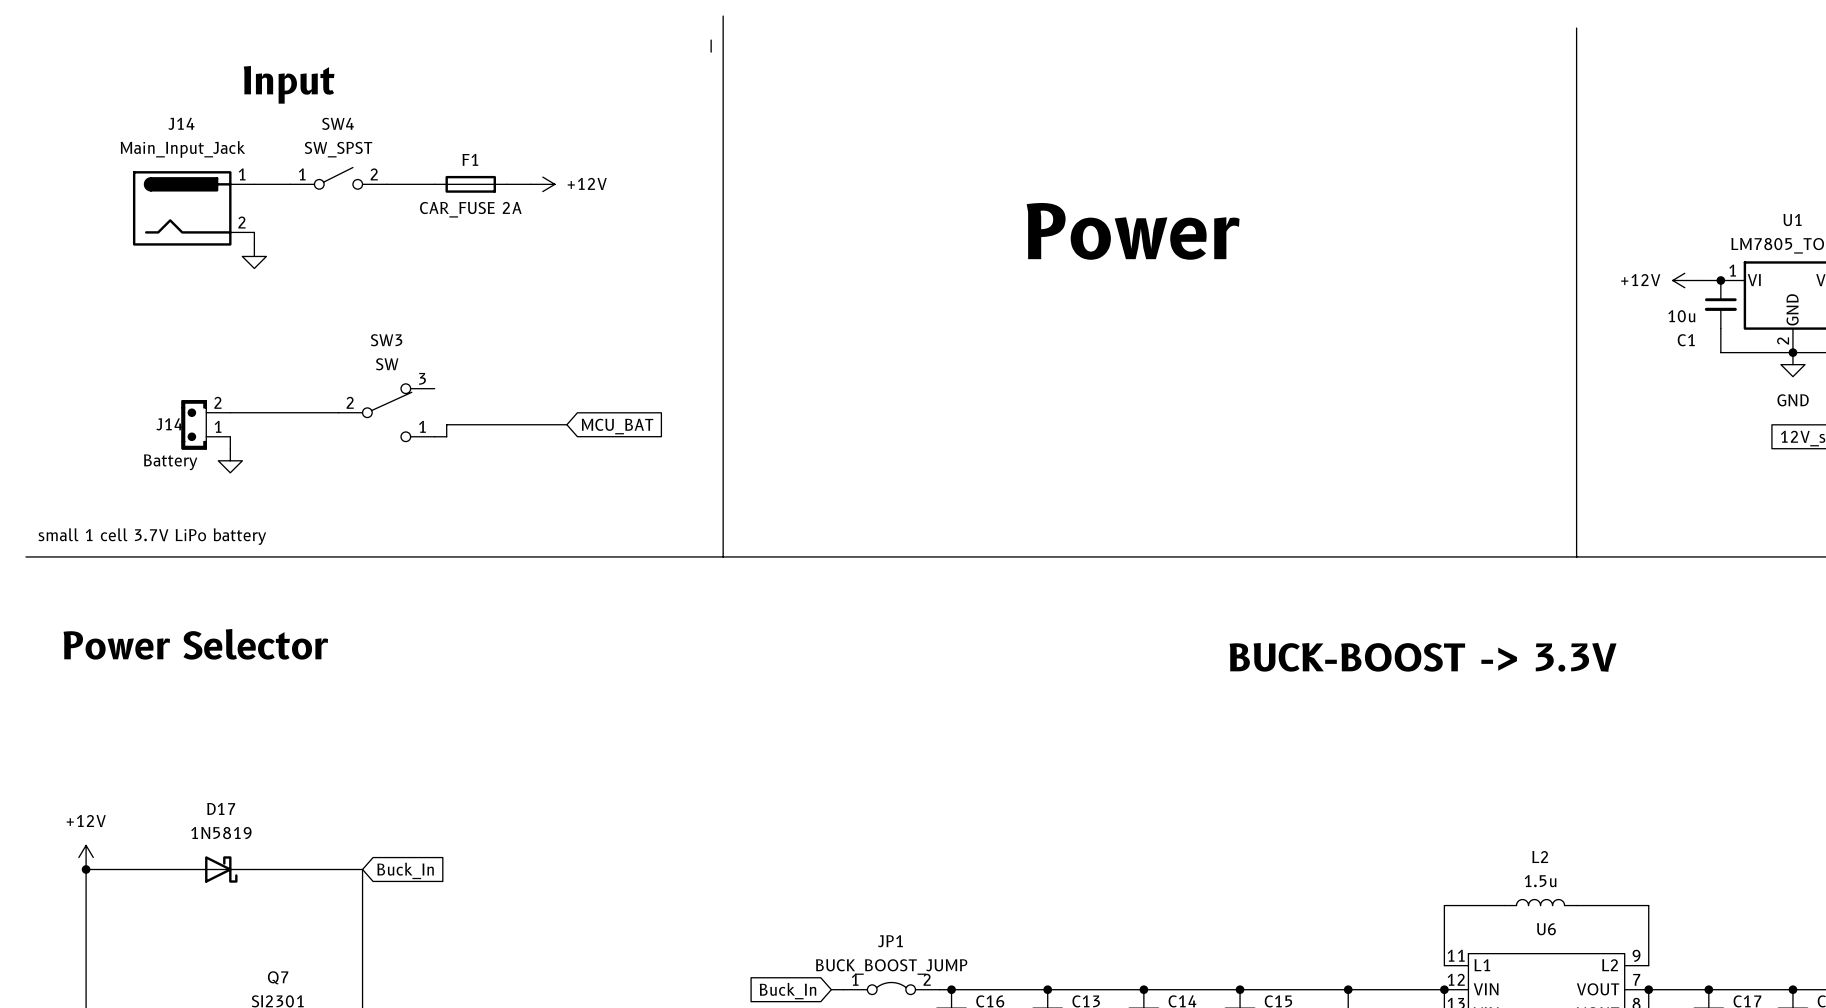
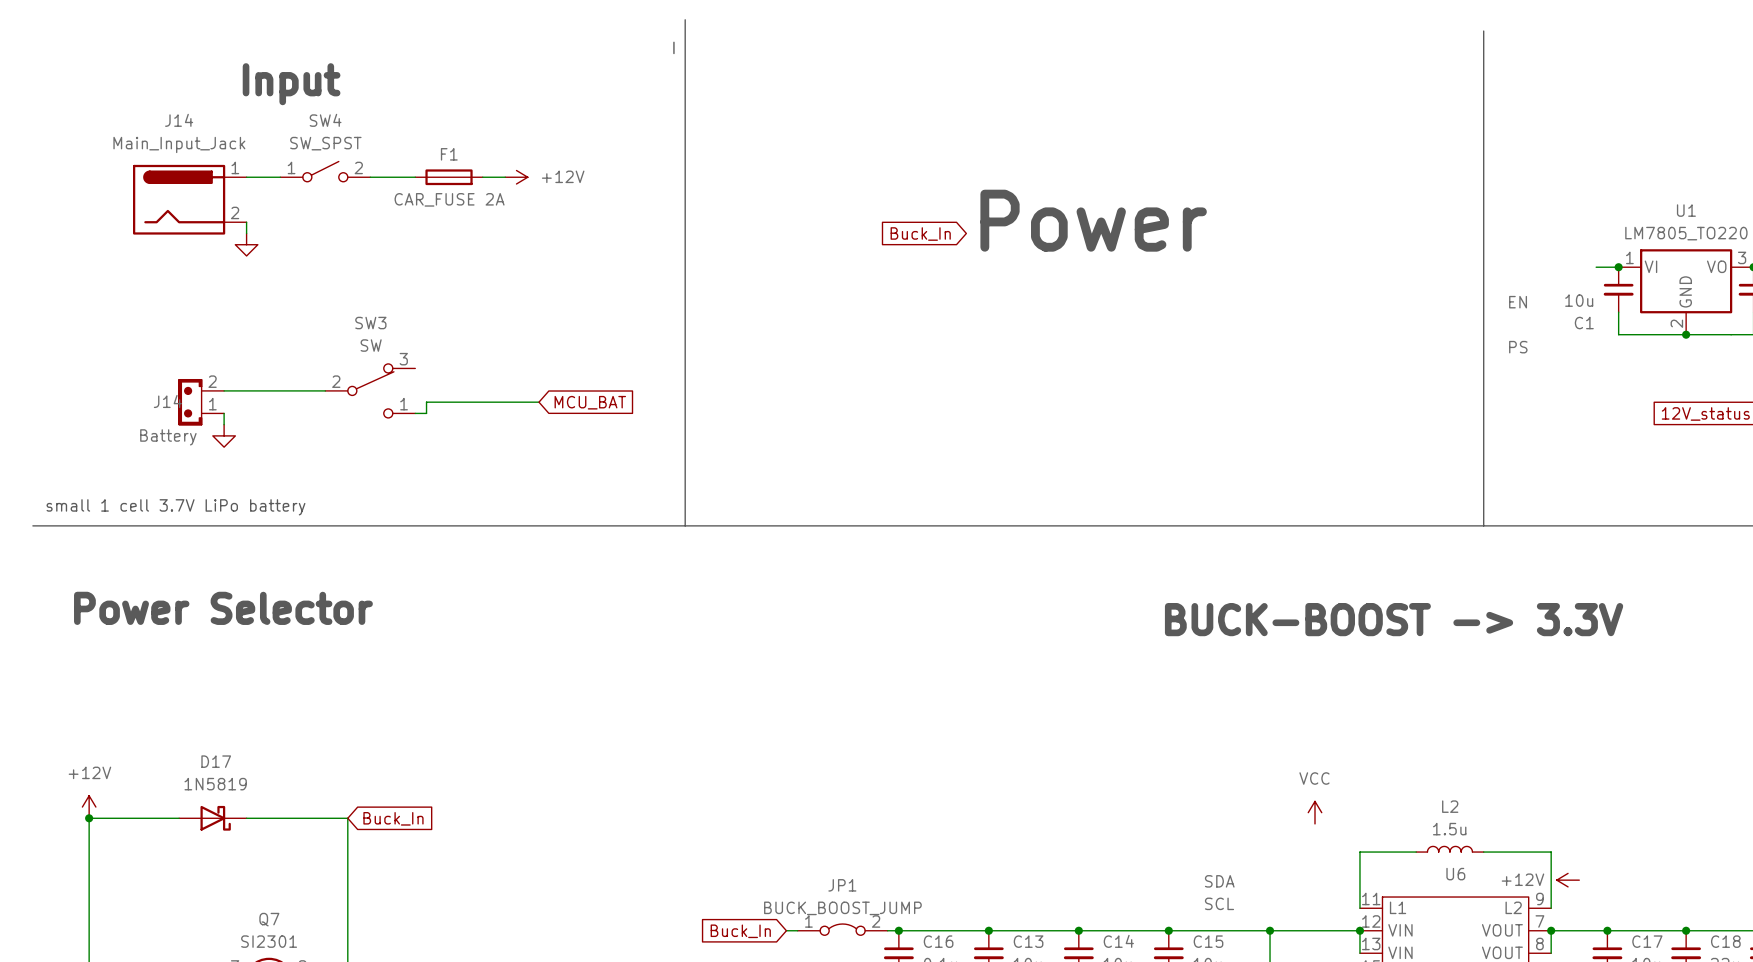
global label: none -> Buck_In (920, 234)
power symbol: +12V (1684, 280) -> none
label: none -> EN (1518, 302)
power symbol: GND (1792, 364) -> none
label: none -> PS (1518, 347)
power symbol: none -> VCC (1315, 812)
power symbol: none -> +12V (1568, 880)
label: none -> SDA (1219, 881)
label: none -> SCL (1219, 903)

